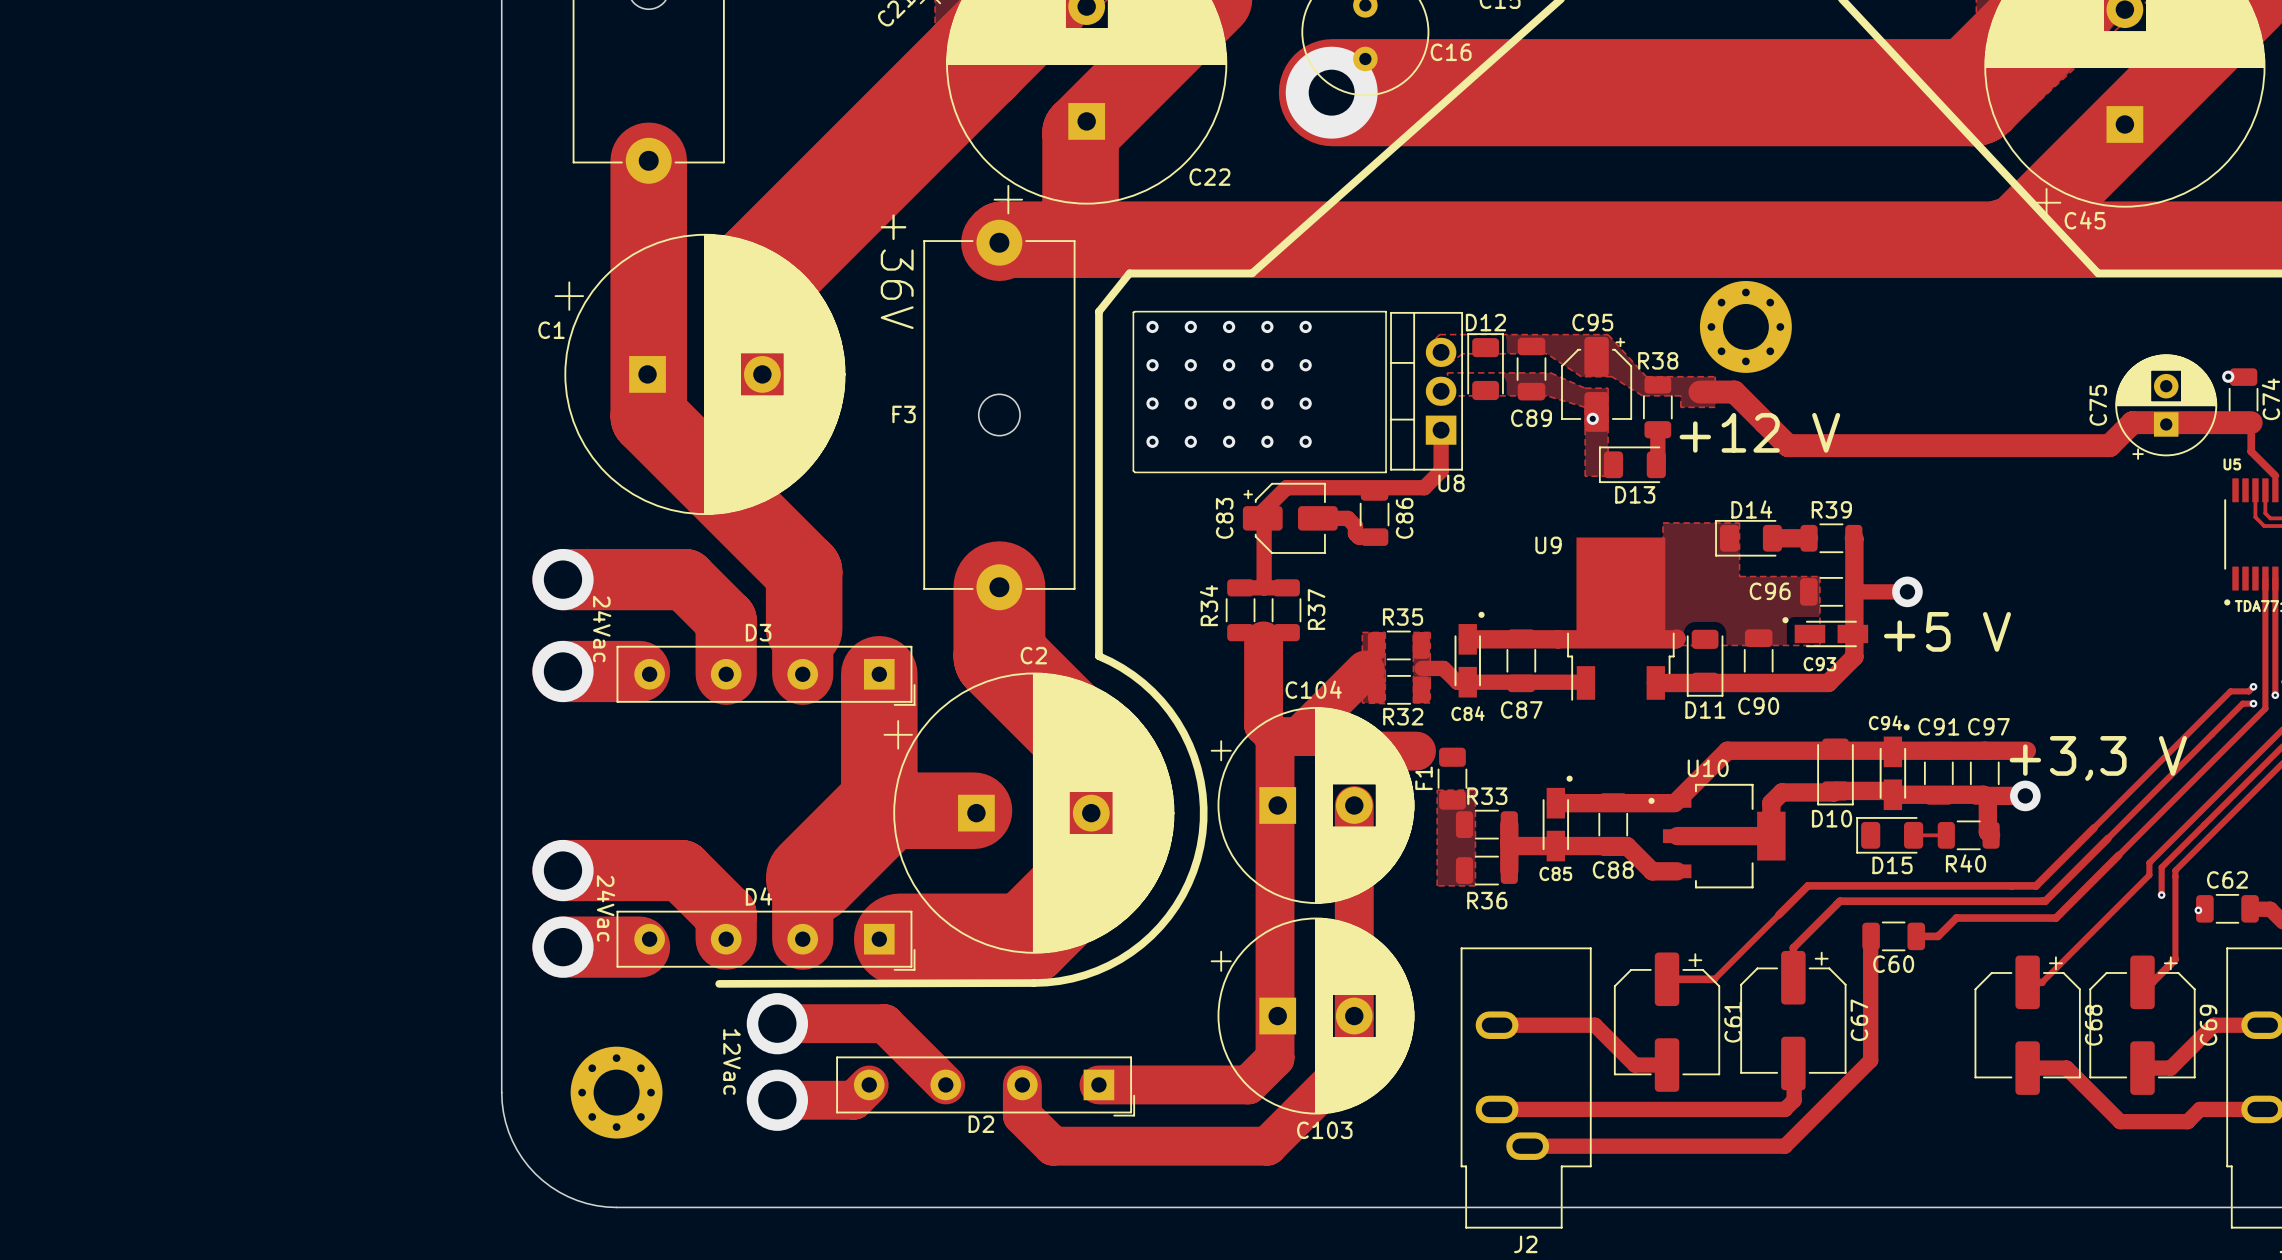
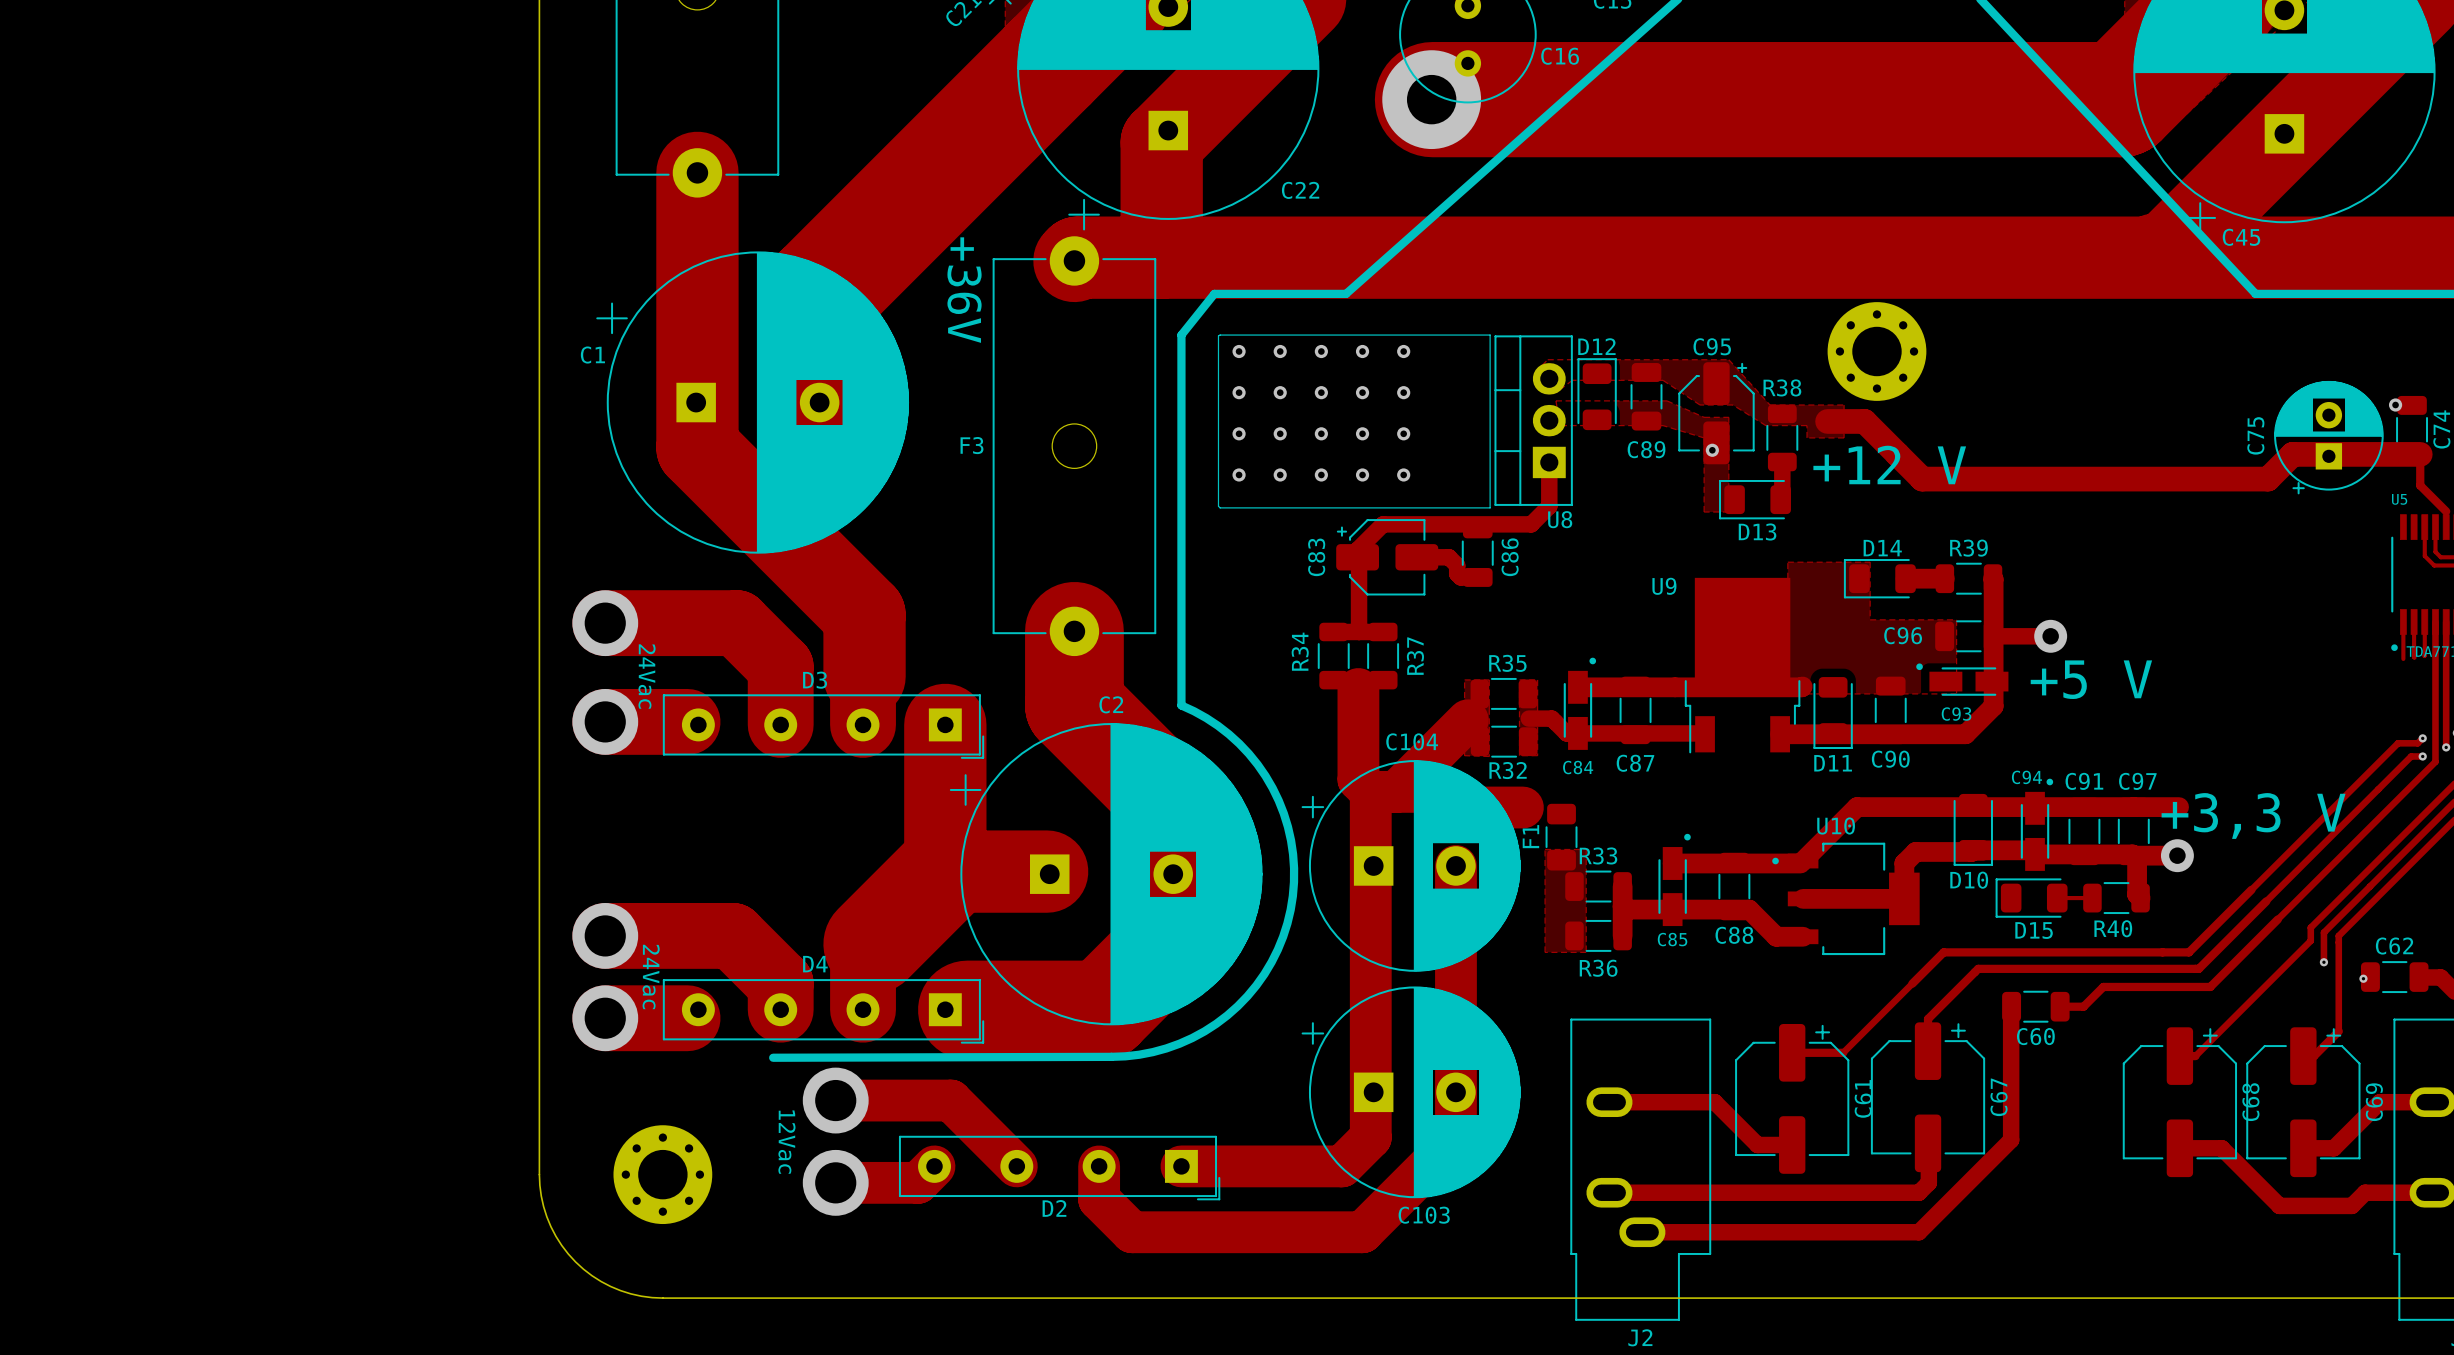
track: none -> (2403, 621) (2403, 658)
track: none -> (2414, 621) (2414, 657)
track: none -> (2424, 621) (2424, 656)

